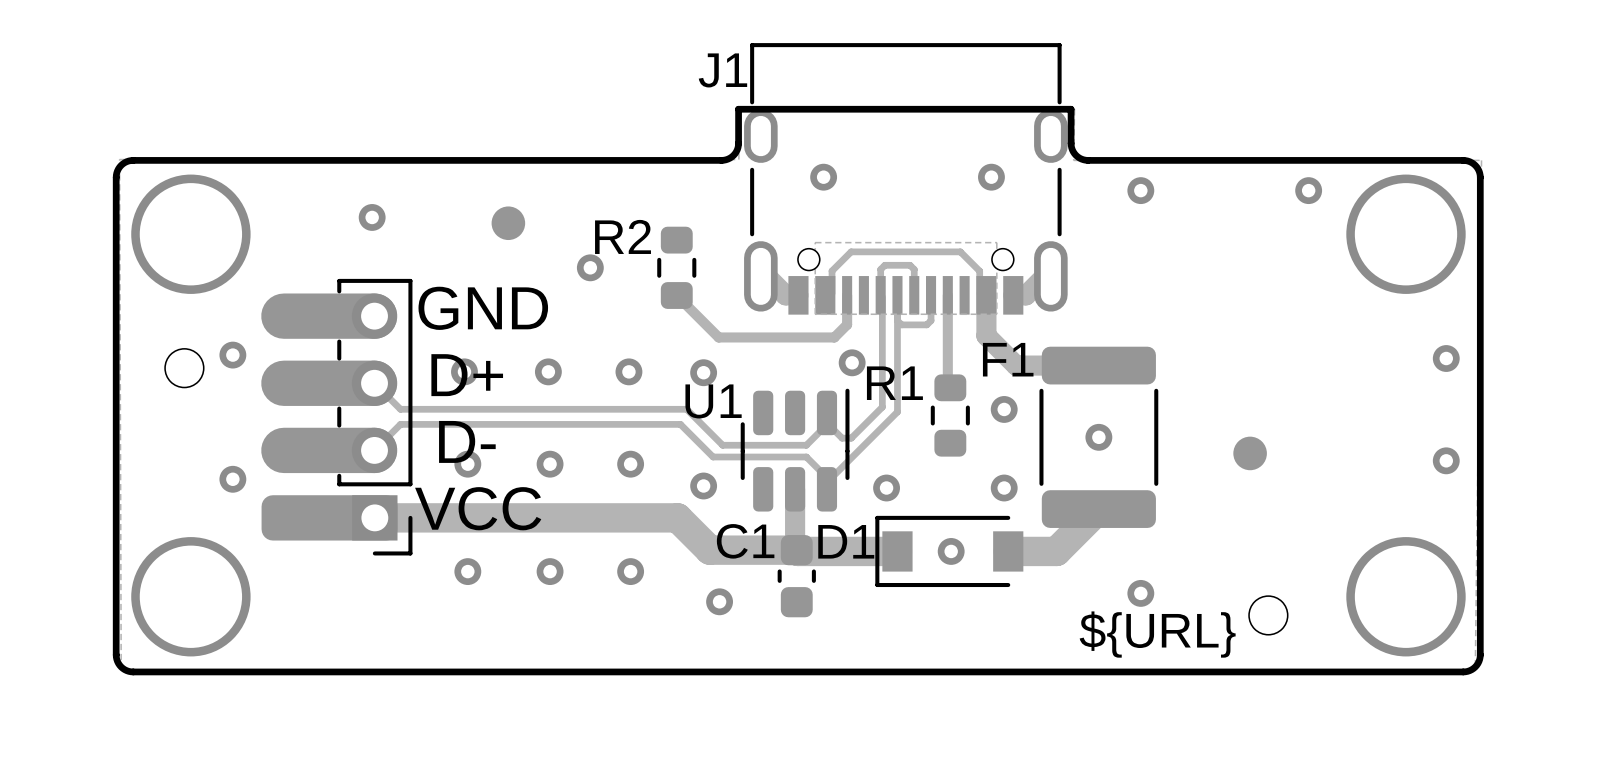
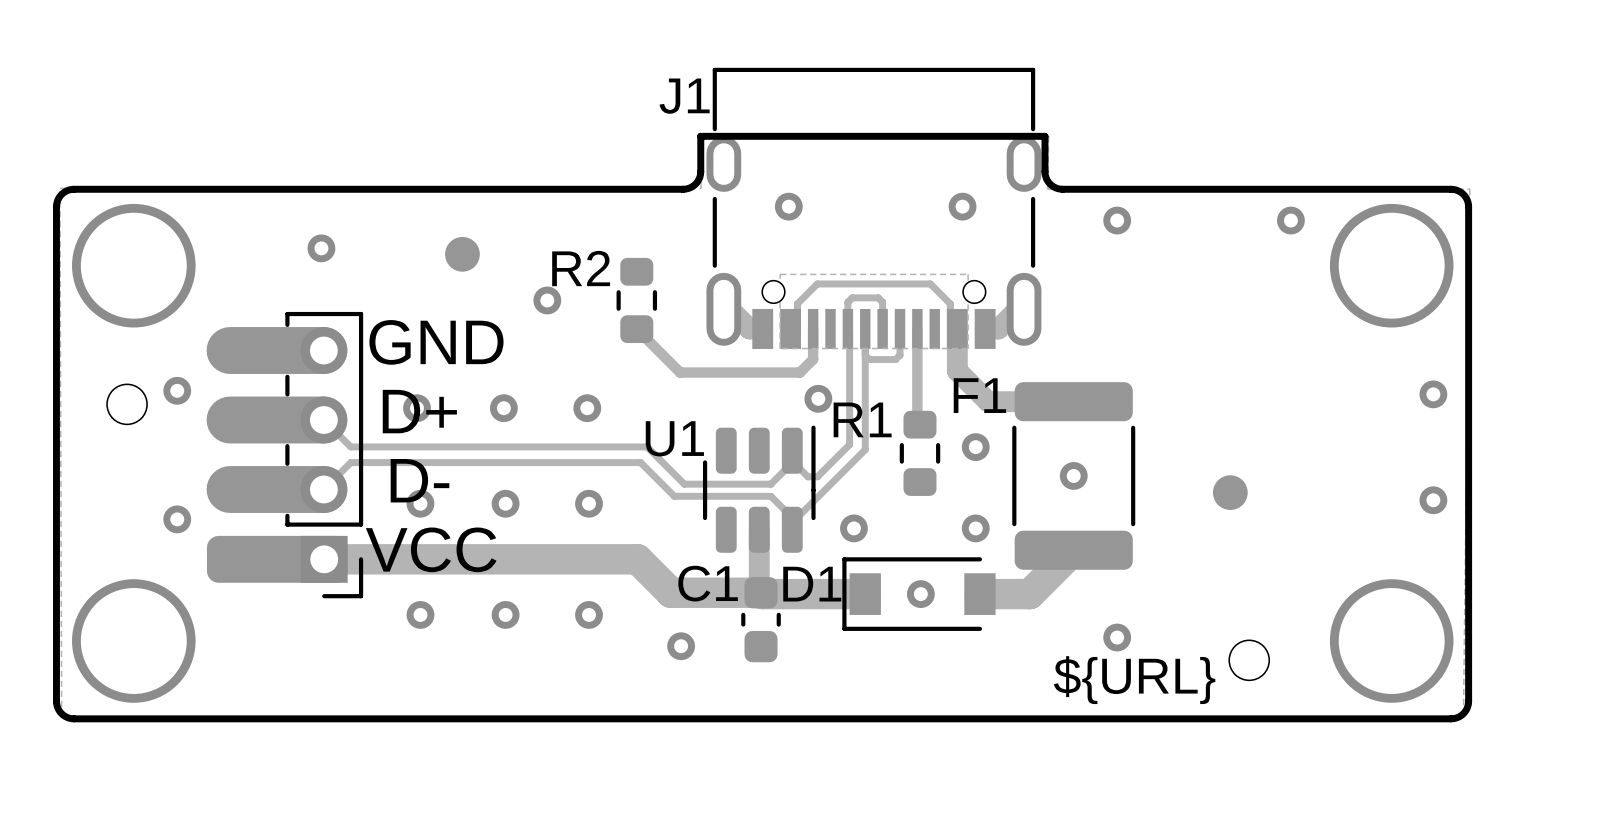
via: (703, 372) -> none
via: (703, 485) -> none

